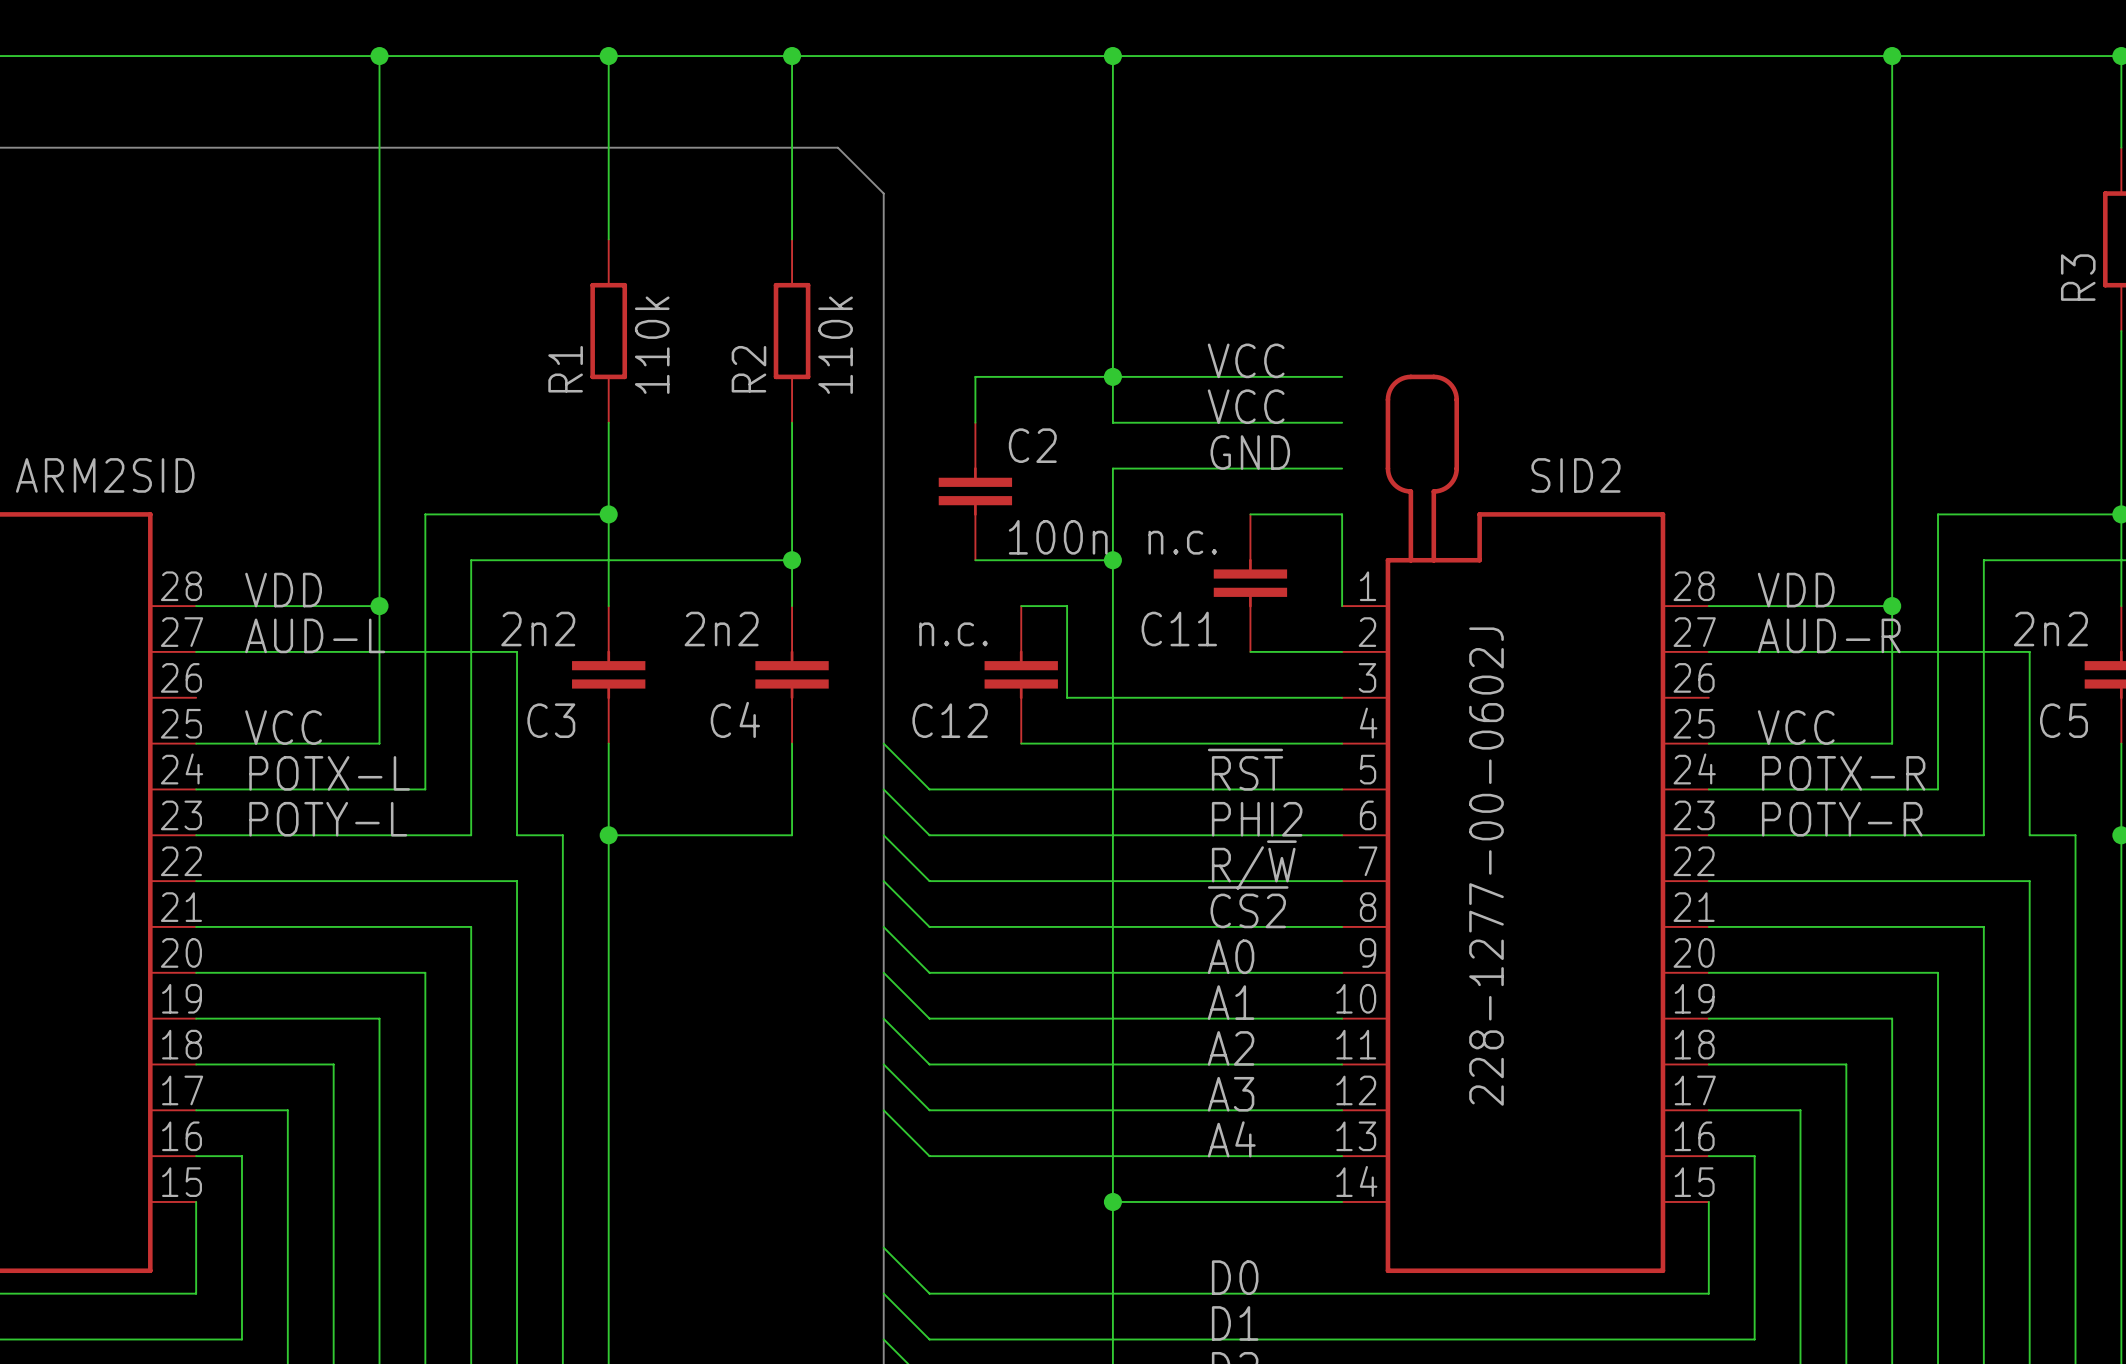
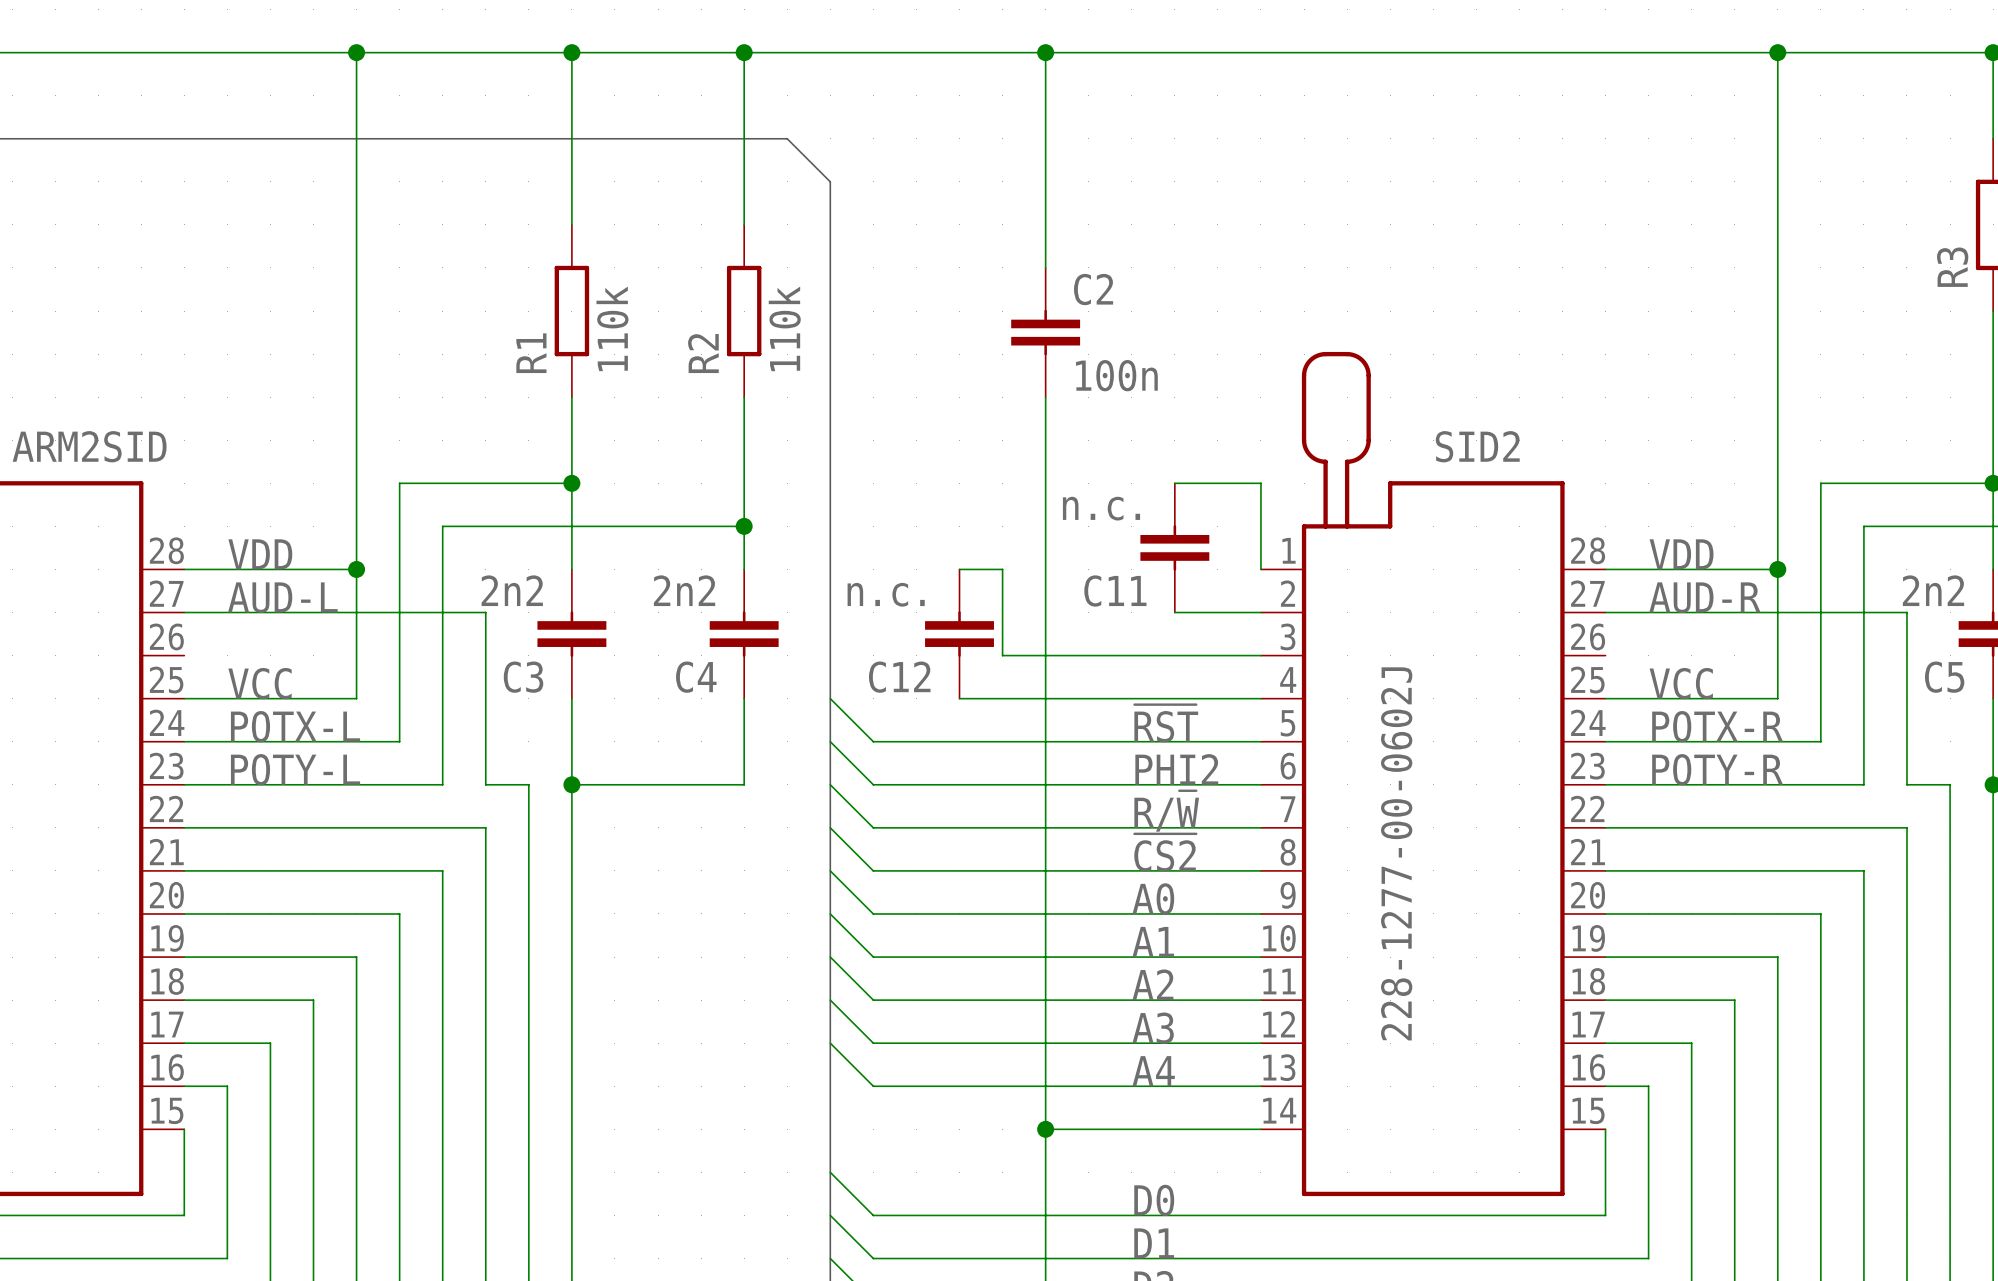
wire: (1112, 285) (1112, 422) (1342, 422) -> none
label: VCC (1246, 360) -> none
junction: (1112, 376) -> none
wire: (1342, 376) (975, 376) (975, 422) -> none
label: VCC (1246, 406) -> none
label: GND (1250, 452) -> none
wire: (1112, 468) (1342, 468) -> (1045, 440) (1045, 397)
C2 position: (975, 491) -> (1045, 332)
wire: (975, 560) (1112, 560) -> none
junction: (1112, 560) -> none

